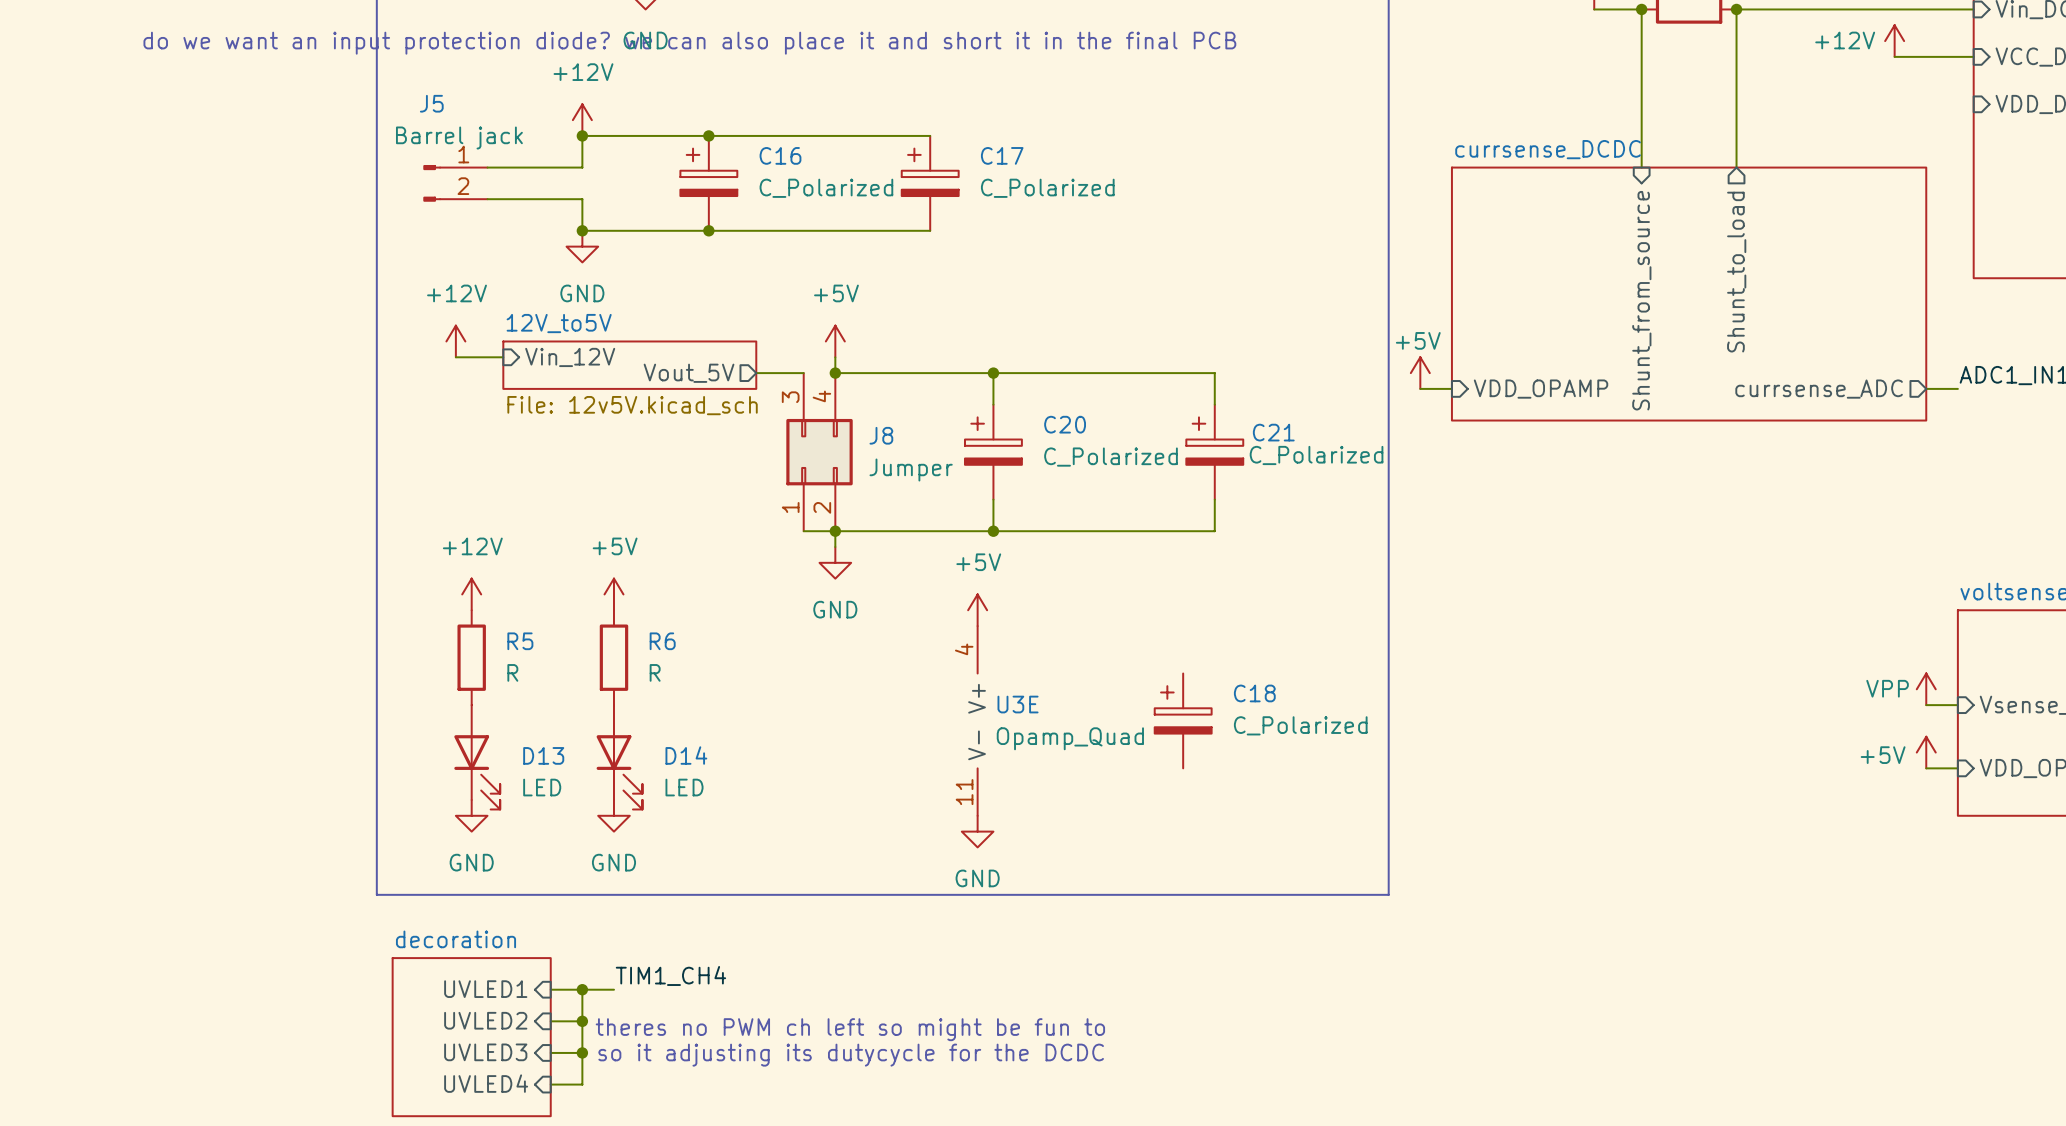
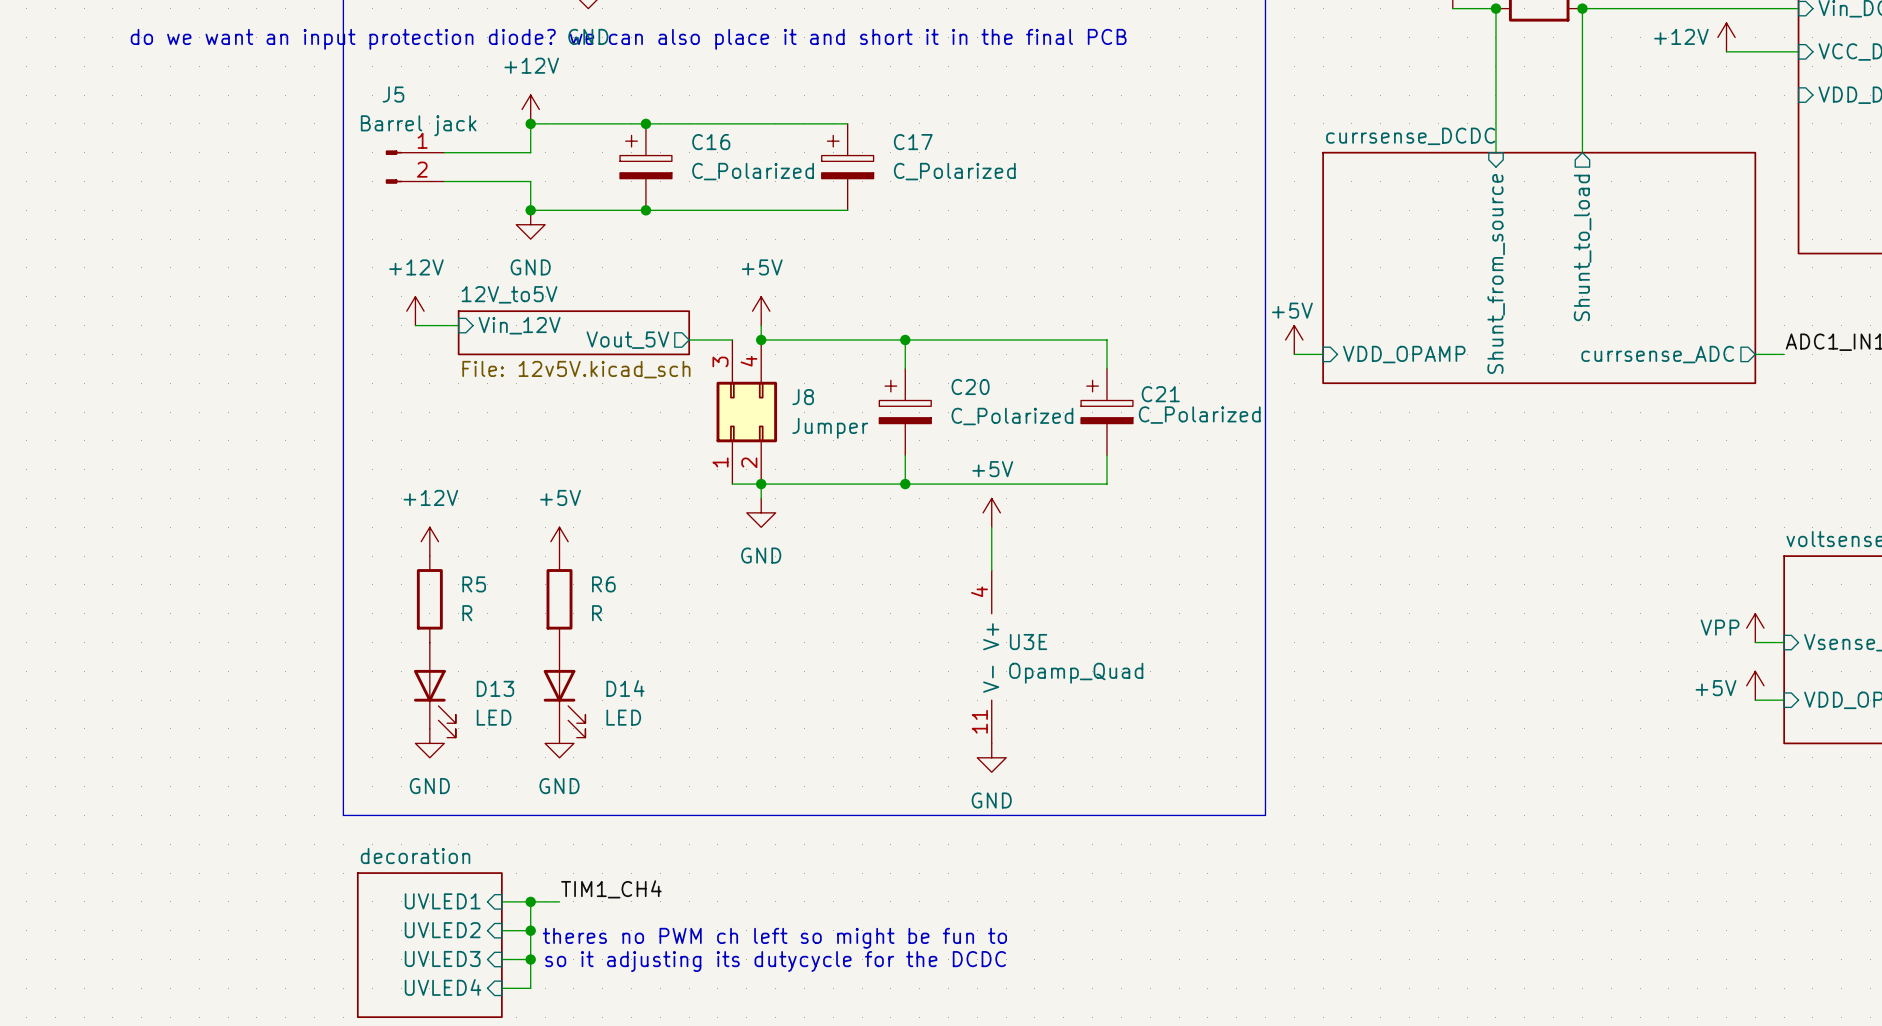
wire: none -> (991, 527) (991, 570)
power symbol position: +5V (977, 610) -> +5V (991, 512)
U3E position: (977, 720) -> (991, 656)
C18: C_Polarized (1183, 720) -> none
power symbol position: GND (977, 831) -> GND (991, 757)

